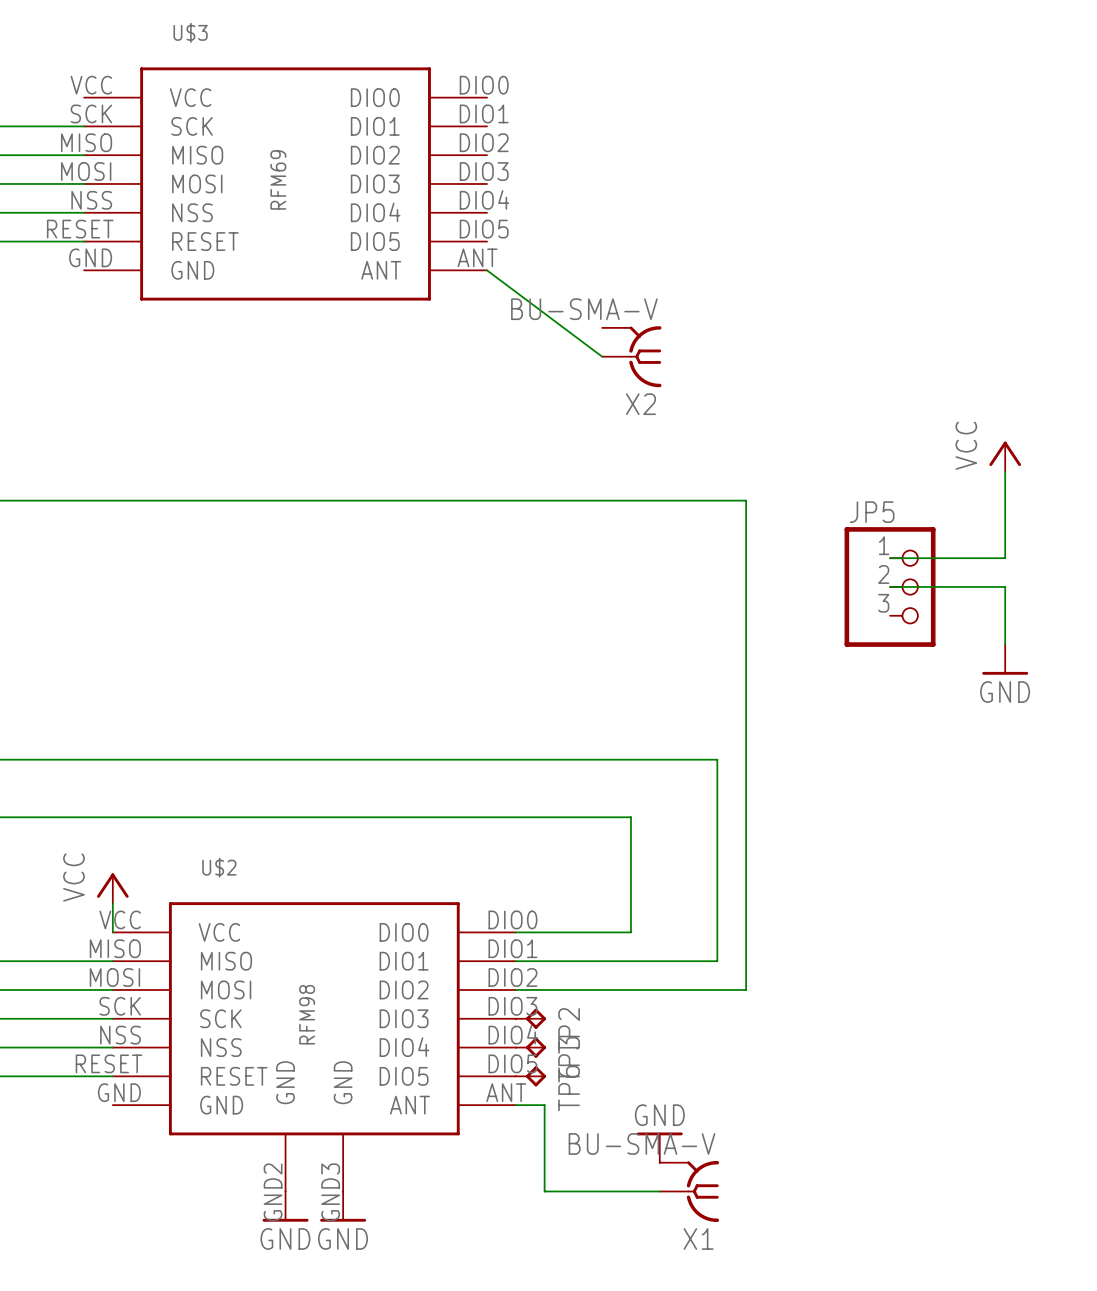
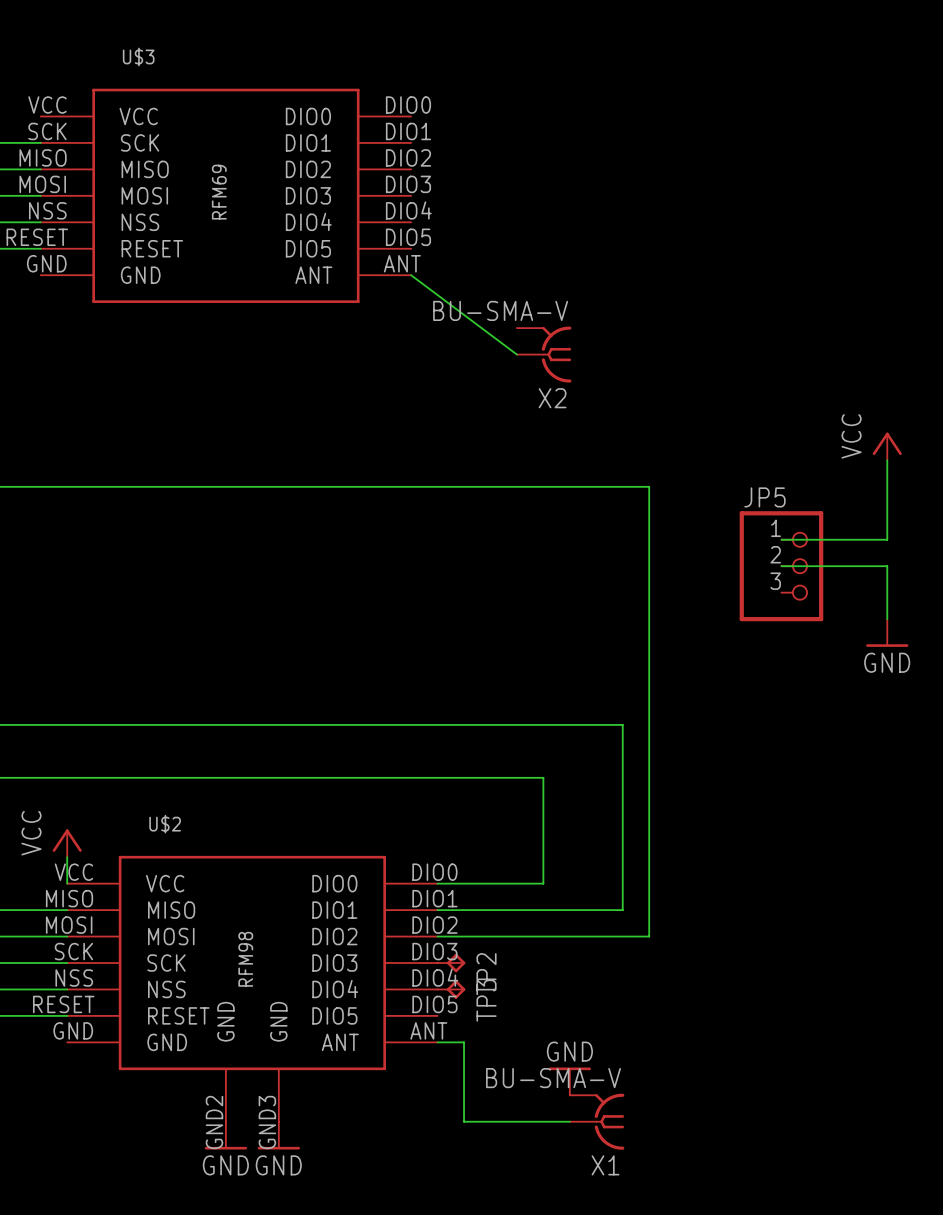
TP6: (530, 1076) -> none

